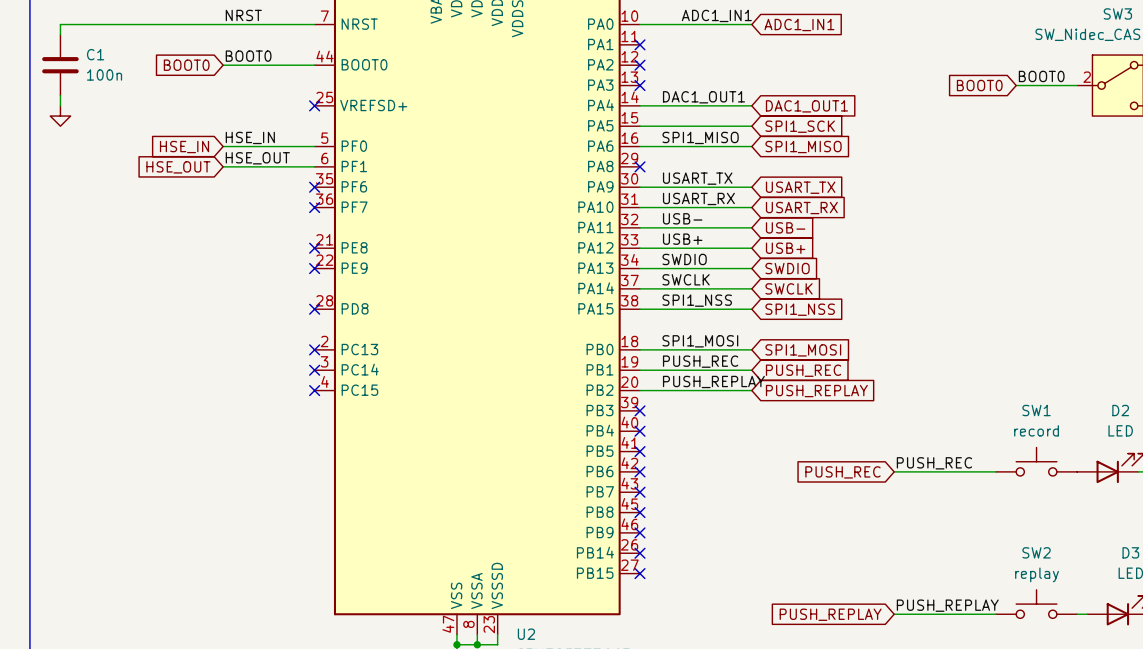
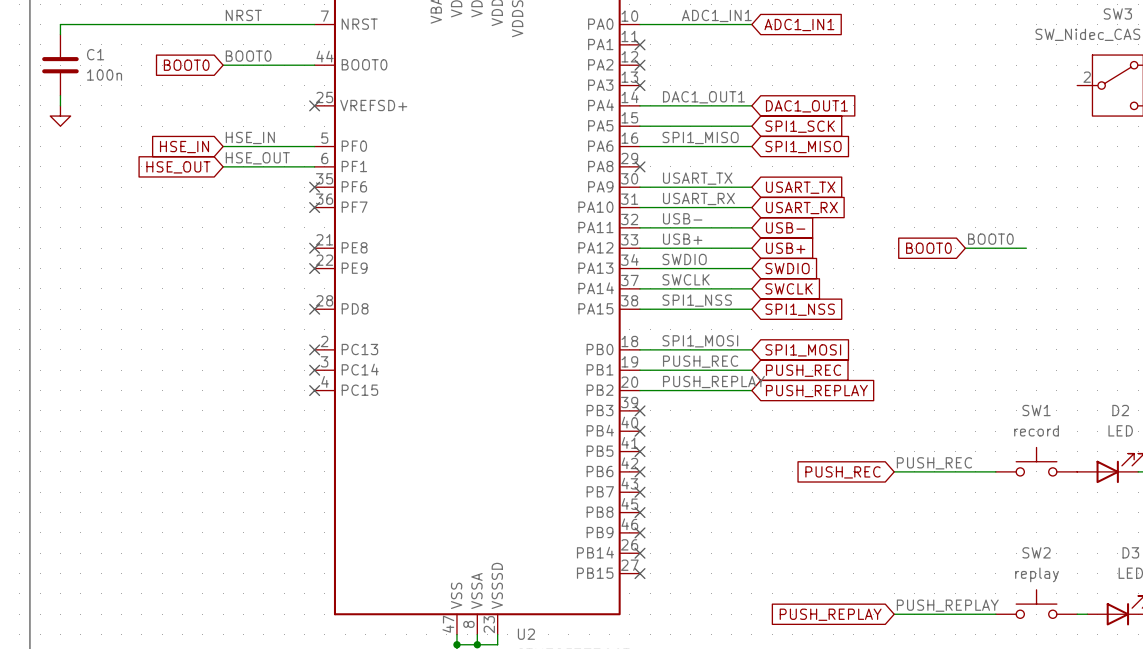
label position: BOOT0 (1041, 76) -> BOOT0 (990, 239)
global label position: BOOT0 (979, 85) -> BOOT0 (928, 248)
wire: (1016, 85) (1077, 85) -> (965, 248) (1026, 248)

